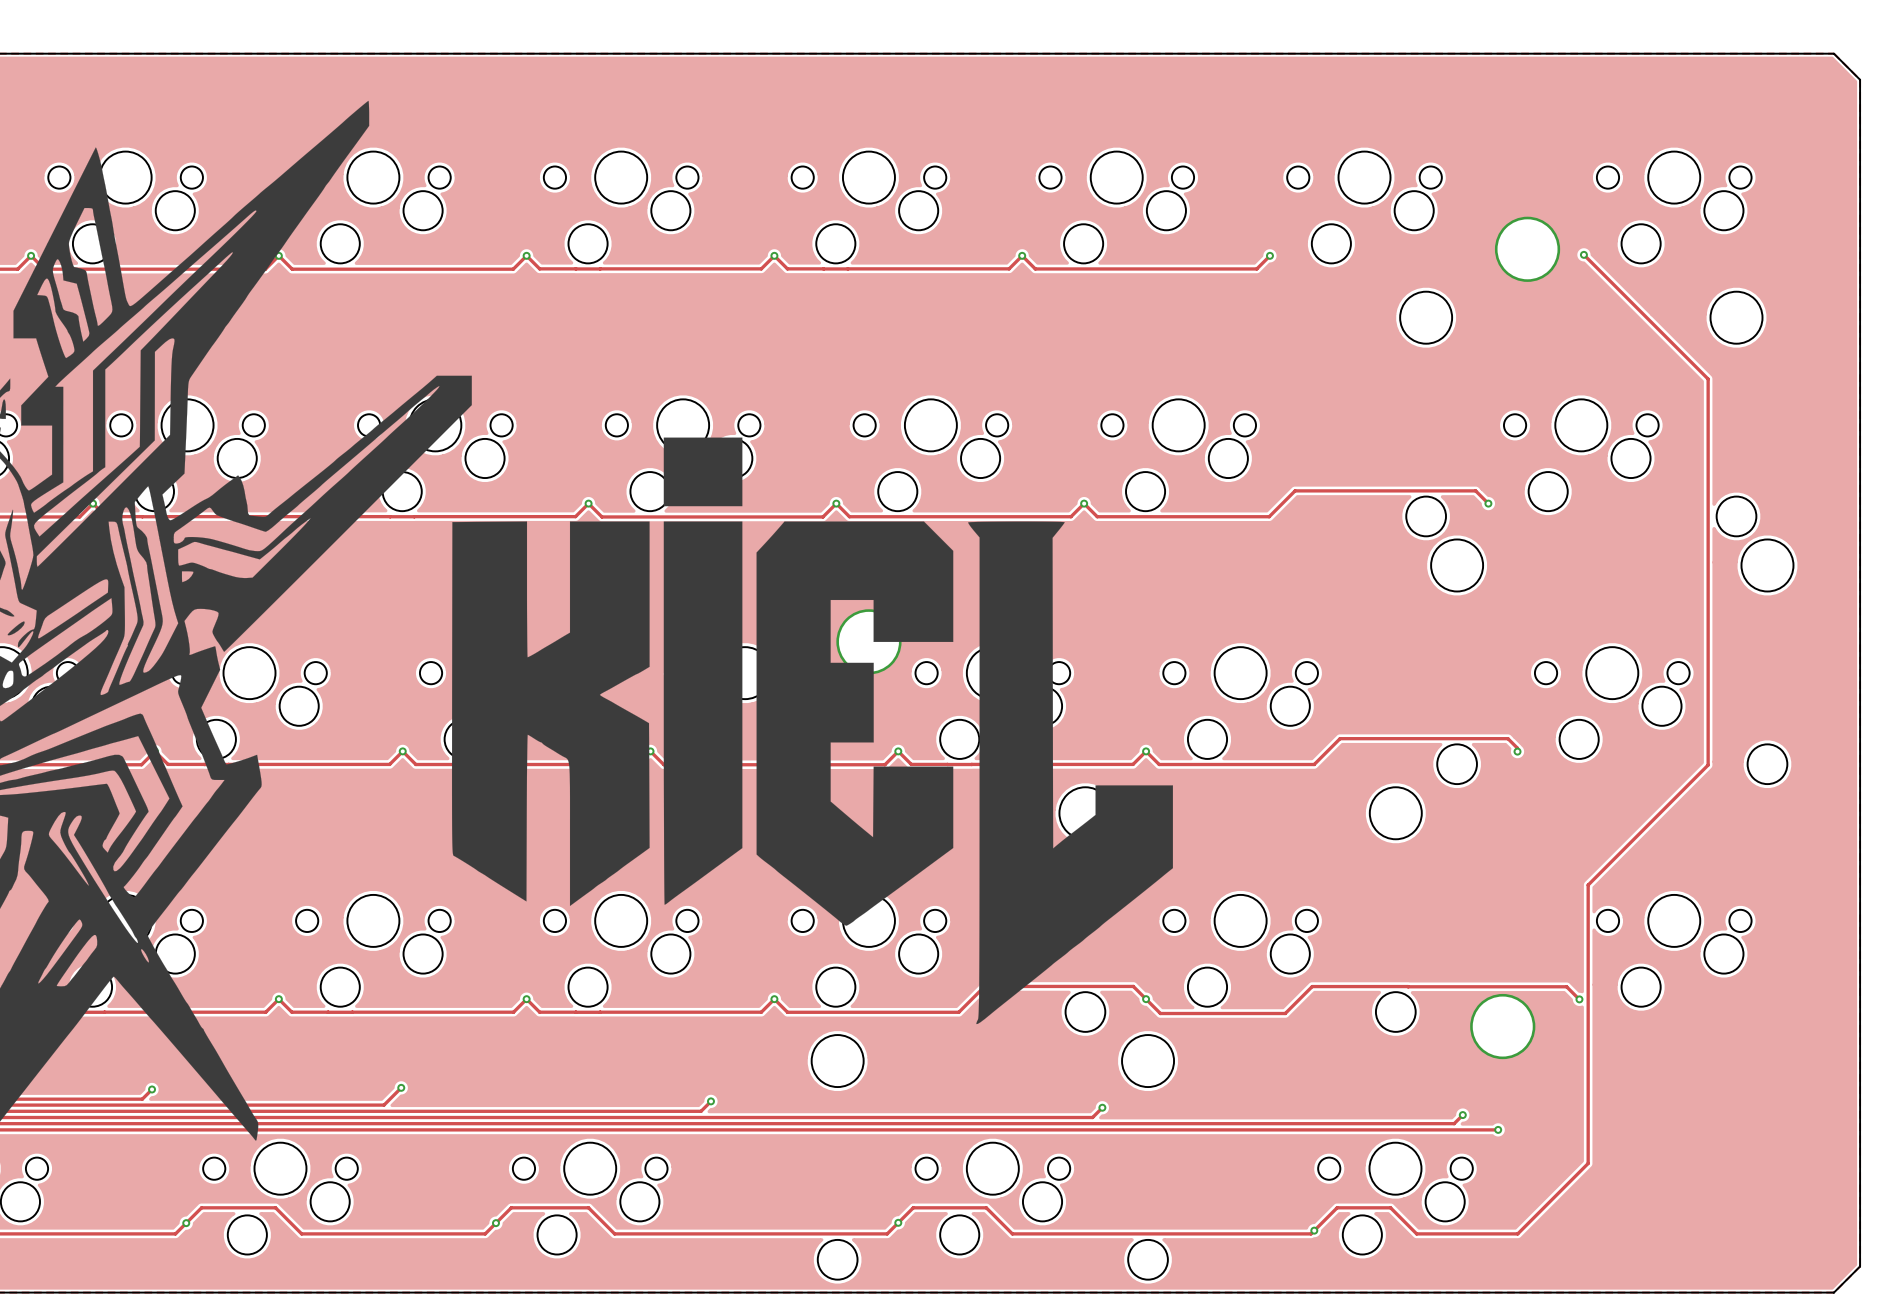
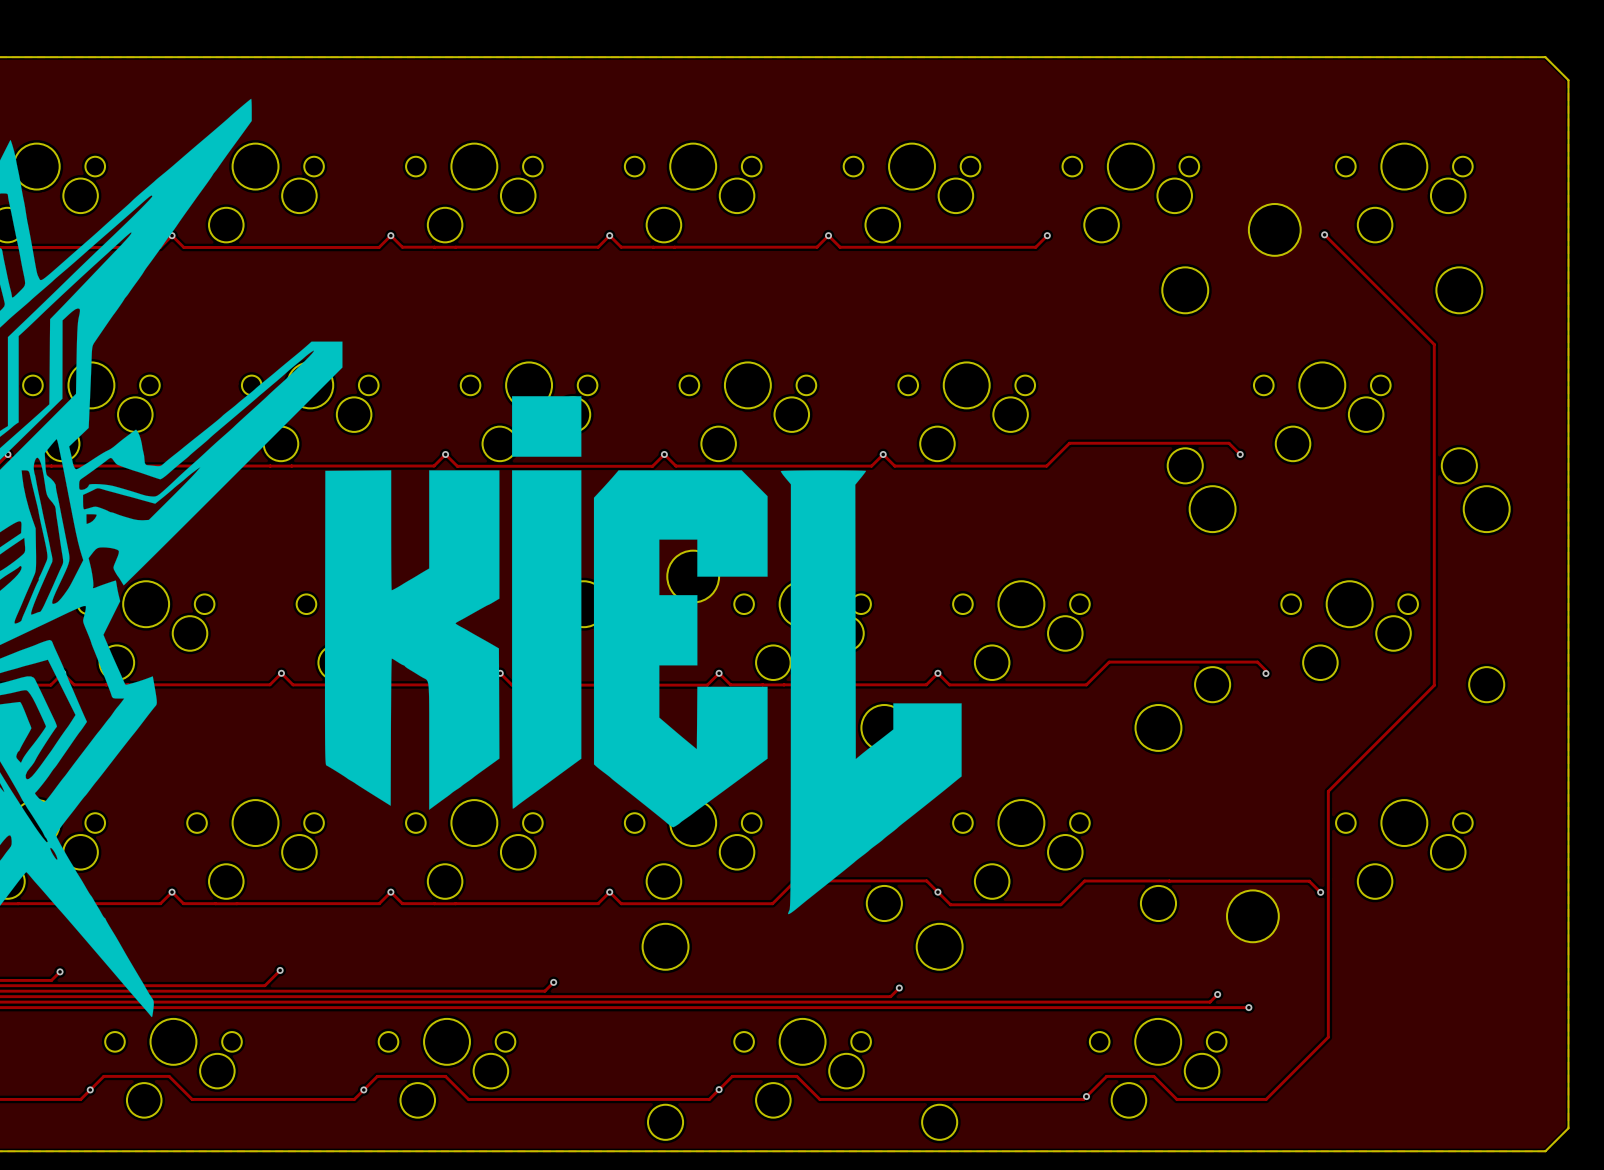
via: (1527, 249) -> none
part: none -> (1274, 229)
via: (868, 641) -> none
part: none -> (693, 576)
via: (1502, 1026) -> none
part: none -> (1252, 916)

